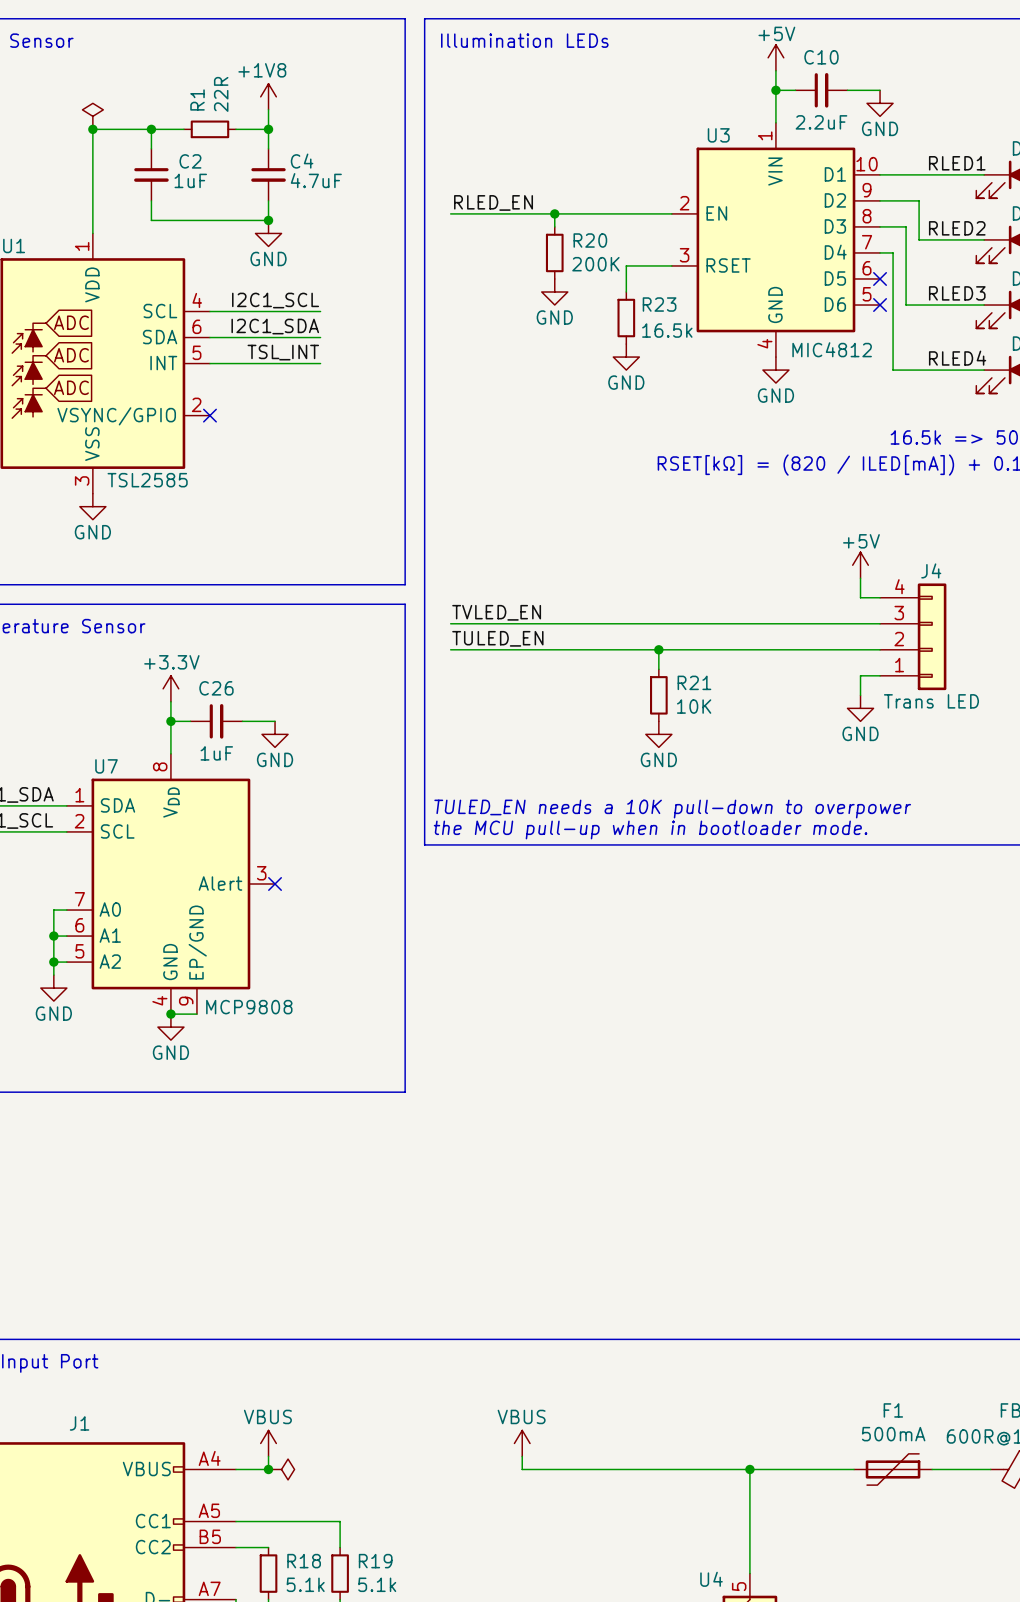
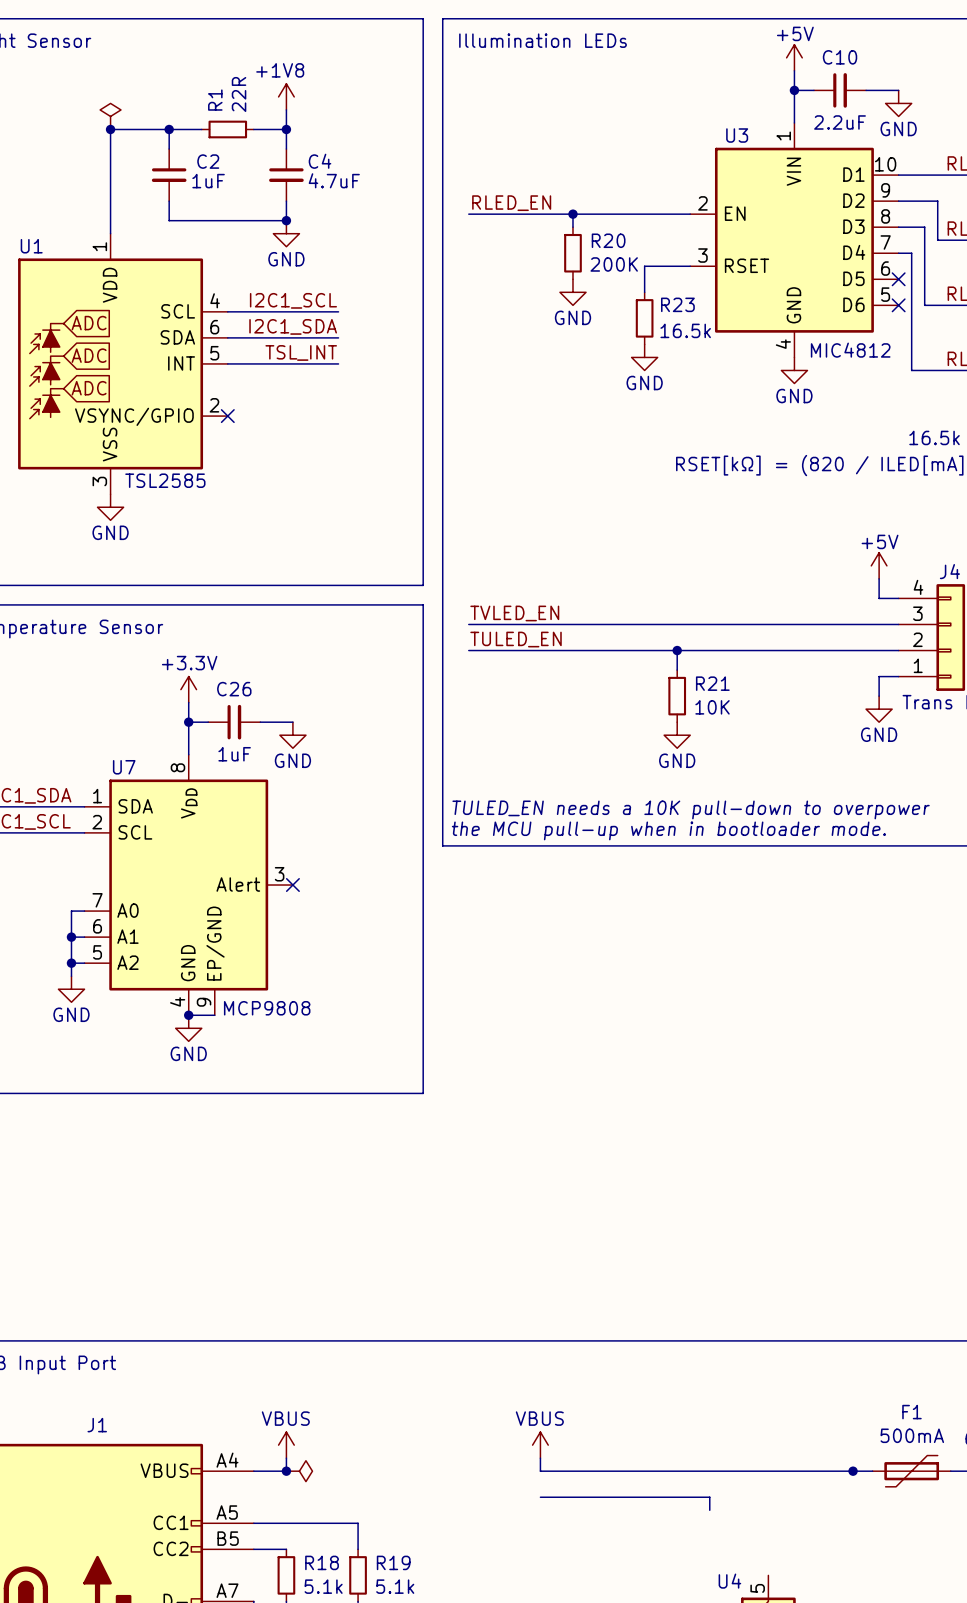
wire: (749, 1469) (749, 1573) -> none
junction: (749, 1469) -> none
junction: none -> (853, 1471)
wire: none -> (540, 1497) (709, 1497) (709, 1510)

